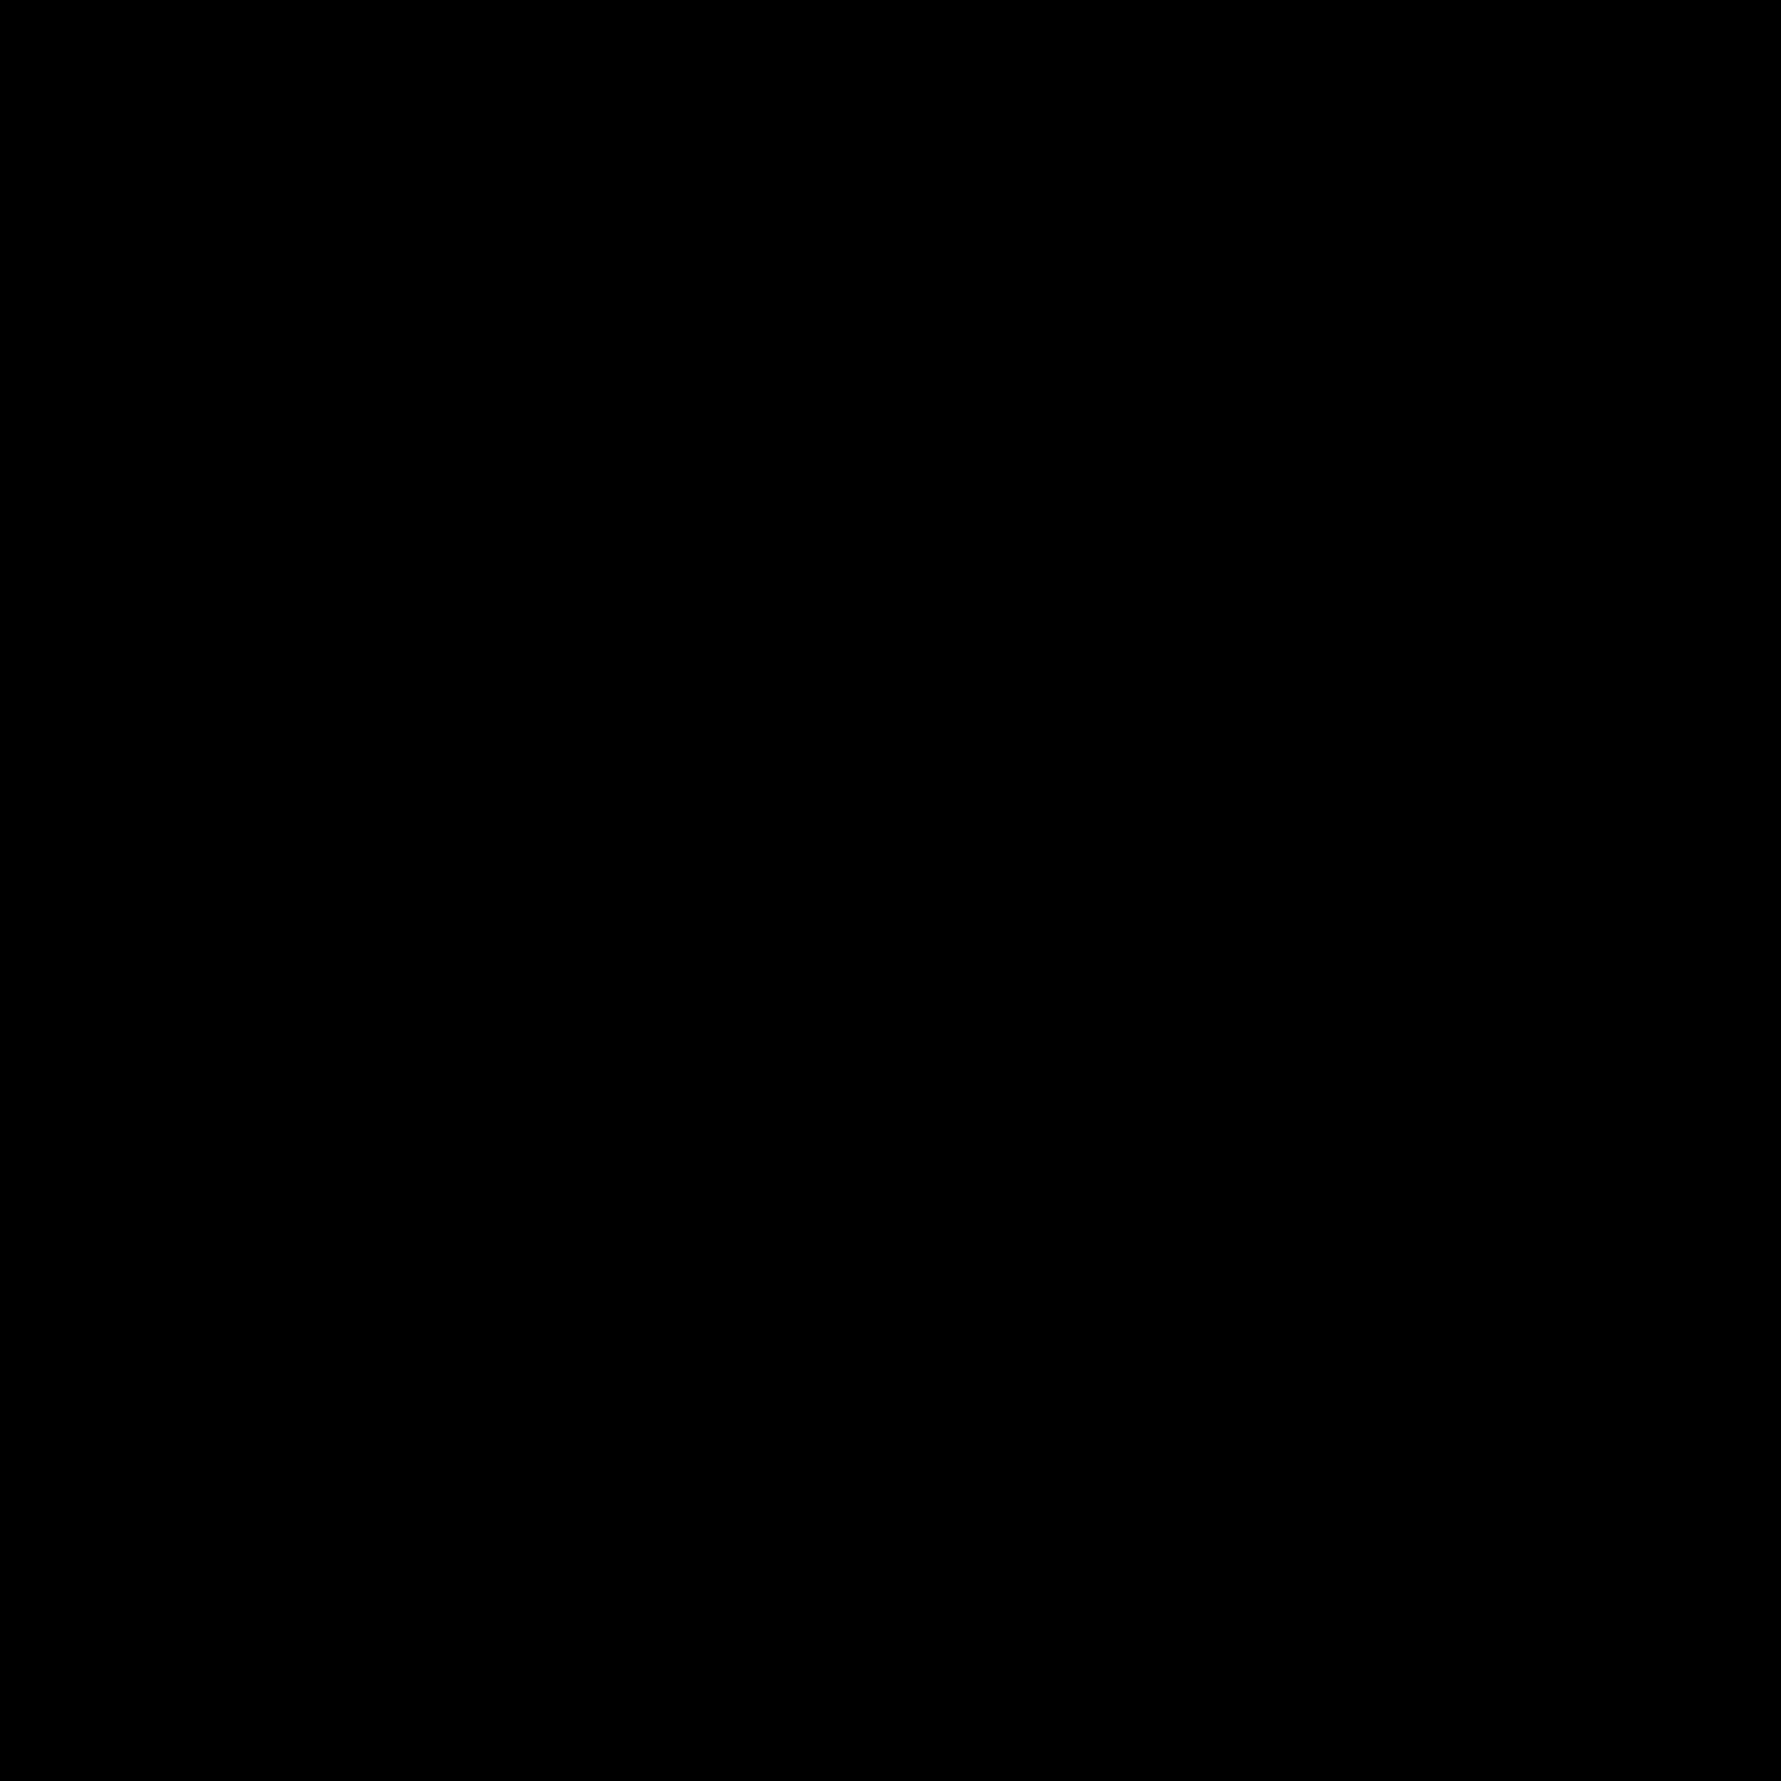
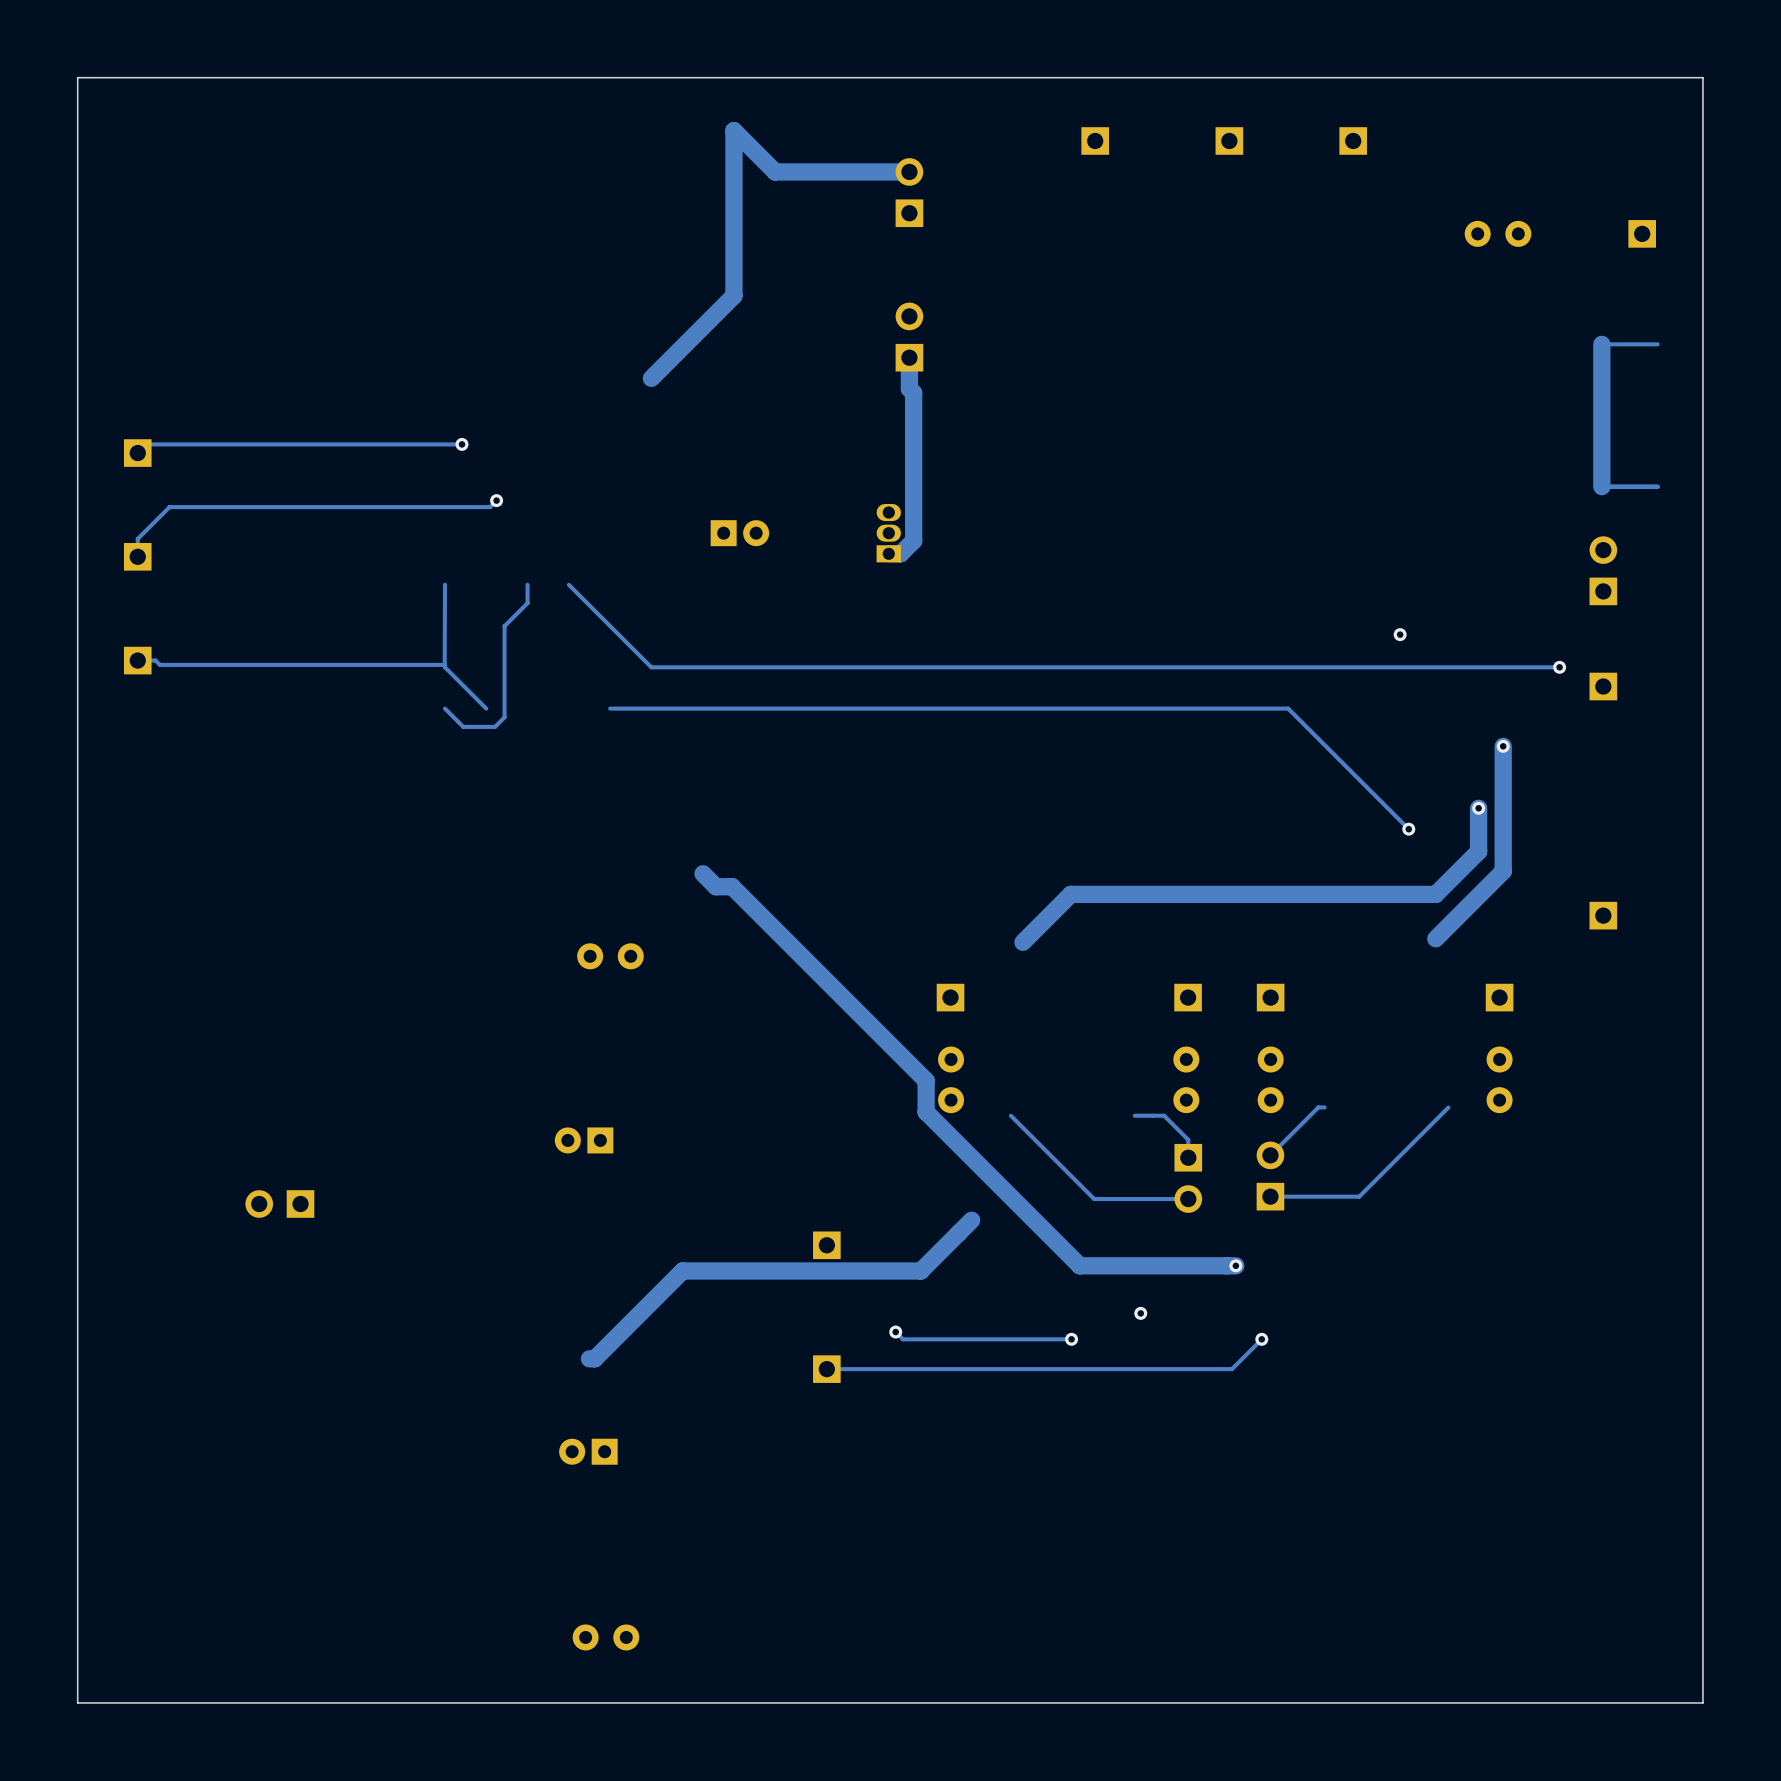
board edge: none -> (1702, 77) (1702, 1702) (77, 1702) (77, 77) (1702, 77)
part: none -> (1095, 140)
part: none -> (1229, 140)
part: none -> (1353, 140)
track: none -> (909, 171) (775, 171) (733, 130) (733, 295) (651, 378)
part: none -> (909, 192)
part: none -> (1498, 233)
part: none -> (1642, 233)
part: none -> (909, 337)
track: none -> (1657, 344) (1601, 344) (1601, 486) (1657, 486)
track: none -> (909, 357) (909, 388) (913, 393) (913, 540) (900, 553) (888, 553)
track: none -> (461, 444) (146, 444) (137, 453)
via: none -> (461, 444)
part: none -> (137, 453)
track: none -> (496, 500) (490, 507) (169, 507) (137, 538) (137, 556)
via: none -> (496, 500)
part: none -> (739, 533)
part: none -> (888, 533)
part: none -> (137, 556)
part: none -> (1603, 570)
track: none -> (444, 584) (444, 664)
track: none -> (527, 584) (527, 603) (504, 626) (504, 717) (495, 726) (463, 726) (444, 708)
track: none -> (568, 584) (651, 667) (1559, 667)
via: none -> (1400, 634)
track: none -> (137, 660) (155, 660) (159, 664) (444, 664)
part: none -> (137, 660)
track: none -> (444, 664) (486, 708)
via: none -> (1559, 667)
part: none -> (1603, 686)
track: none -> (610, 708) (1288, 708) (1408, 829)
track: none -> (1503, 746) (1503, 871) (1435, 938)
via: none -> (1503, 746)
track: none -> (1478, 808) (1478, 851) (1435, 894) (1070, 894) (1022, 942)
via: none -> (1478, 808)
via: none -> (1408, 829)
track: none -> (703, 873) (716, 886) (732, 886) (926, 1080) (926, 1112) (1079, 1265) (1235, 1265)
part: none -> (1603, 915)
part: none -> (610, 956)
part: none -> (950, 997)
part: none -> (1188, 997)
part: none -> (1270, 997)
part: none -> (1499, 997)
part: none -> (951, 1079)
part: none -> (1186, 1079)
part: none -> (1270, 1079)
part: none -> (1499, 1079)
track: none -> (1324, 1107) (1318, 1107) (1270, 1155)
track: none -> (1448, 1107) (1359, 1196) (1270, 1196)
track: none -> (1010, 1115) (1094, 1199) (1188, 1199)
track: none -> (1134, 1115) (1164, 1115) (1188, 1139) (1188, 1157)
part: none -> (584, 1140)
part: none -> (1270, 1176)
part: none -> (1188, 1178)
part: none -> (279, 1204)
track: none -> (971, 1220) (920, 1270) (682, 1270) (594, 1358) (589, 1358)
part: none -> (826, 1245)
via: none -> (1235, 1265)
via: none -> (1140, 1313)
track: none -> (895, 1332) (903, 1339) (1071, 1339)
via: none -> (895, 1332)
via: none -> (1071, 1339)
track: none -> (1261, 1339) (1231, 1369) (826, 1369)
via: none -> (1261, 1339)
part: none -> (826, 1369)
part: none -> (588, 1451)
part: none -> (605, 1637)

